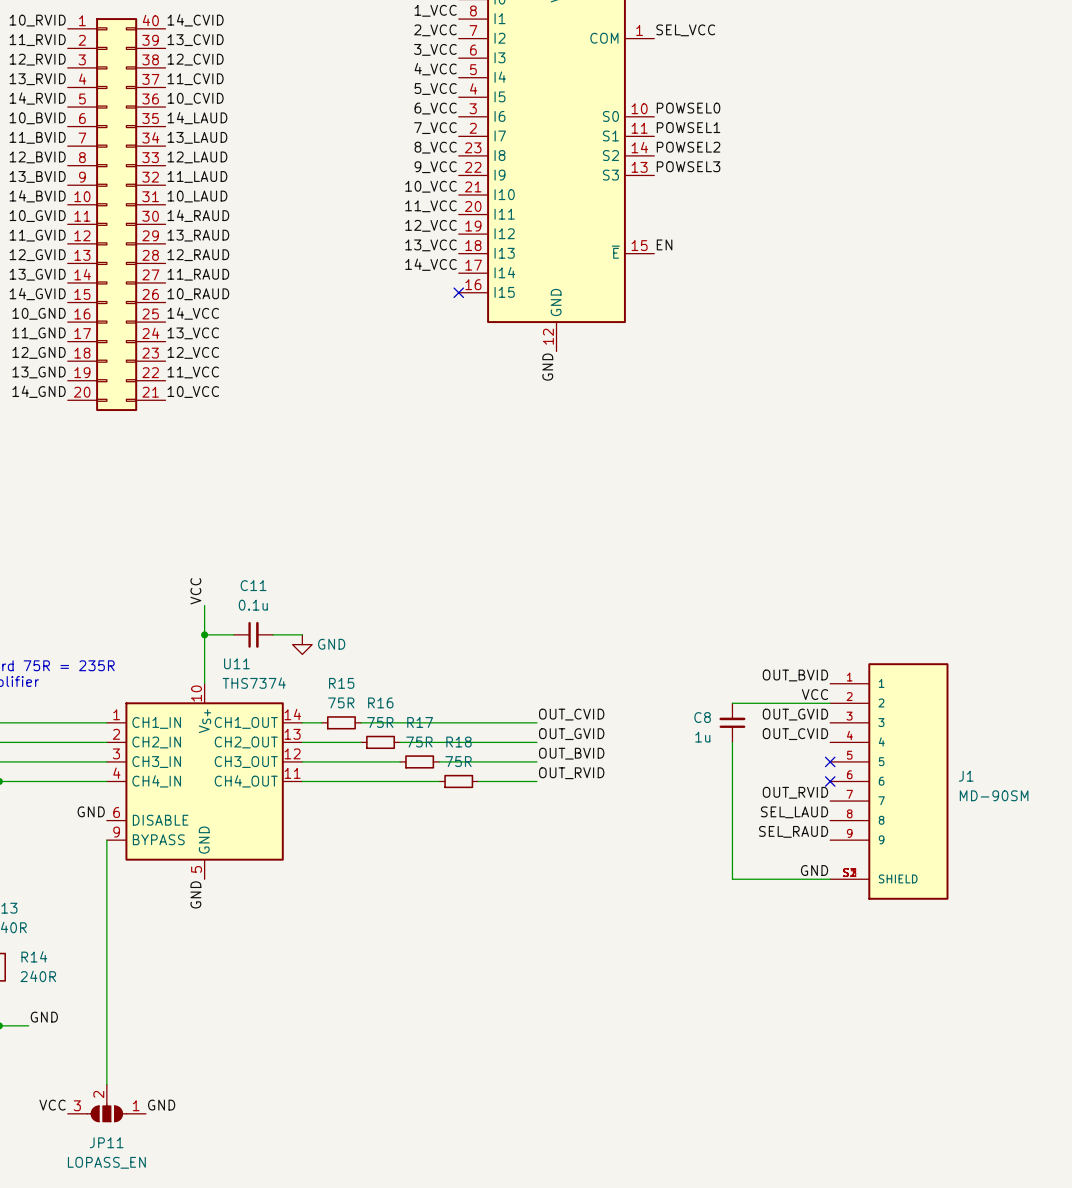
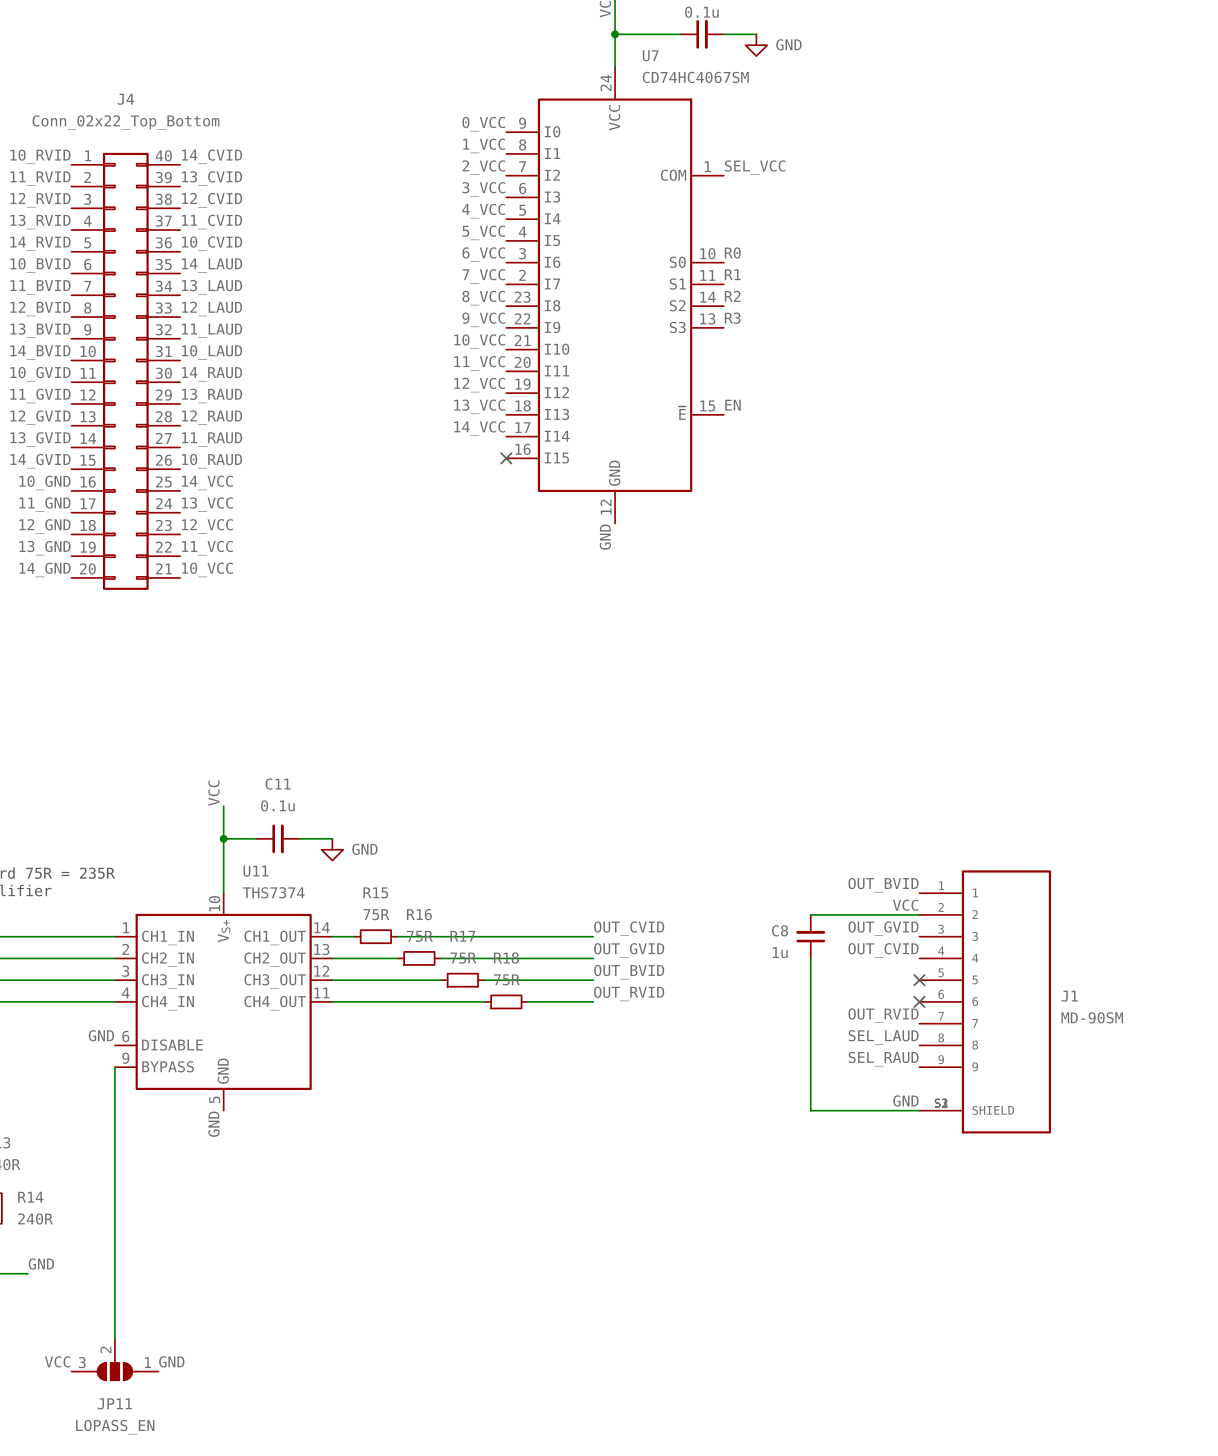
label: POWSEL0 (688, 108) -> R0 (732, 252)
label: POWSEL1 (688, 127) -> R1 (732, 274)
label: POWSEL2 (688, 147) -> R2 (732, 296)
label: POWSEL3 (688, 166) -> R3 (732, 318)

